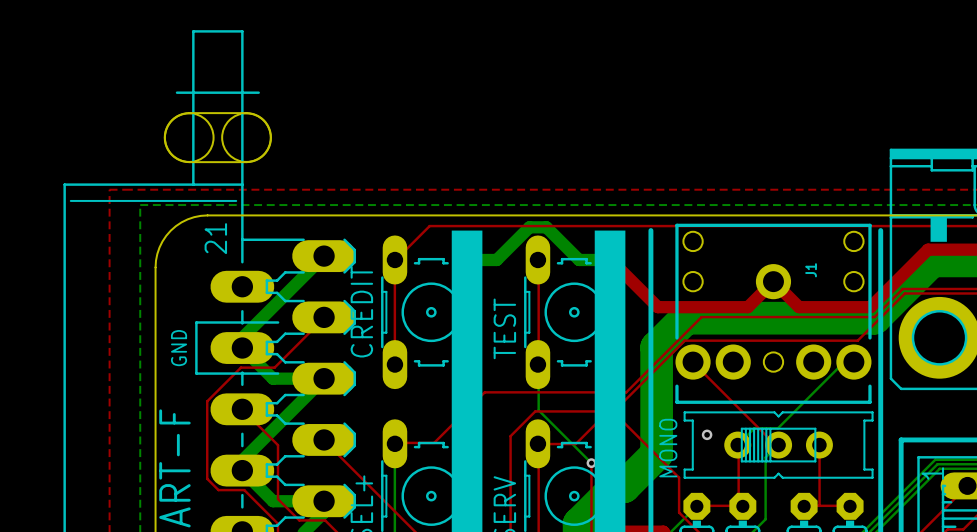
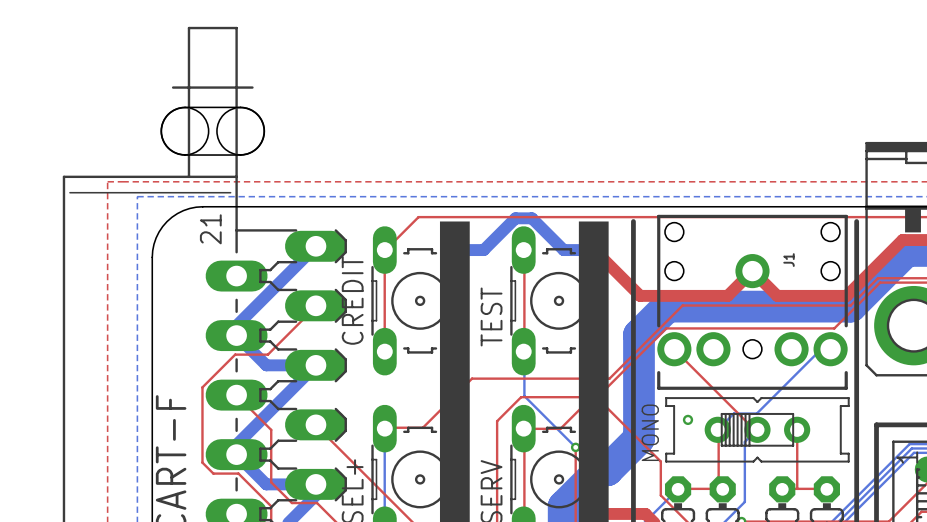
line: (278, 322) (196, 322) (196, 373) (278, 373) -> none
text: GND (179, 348) -> none

